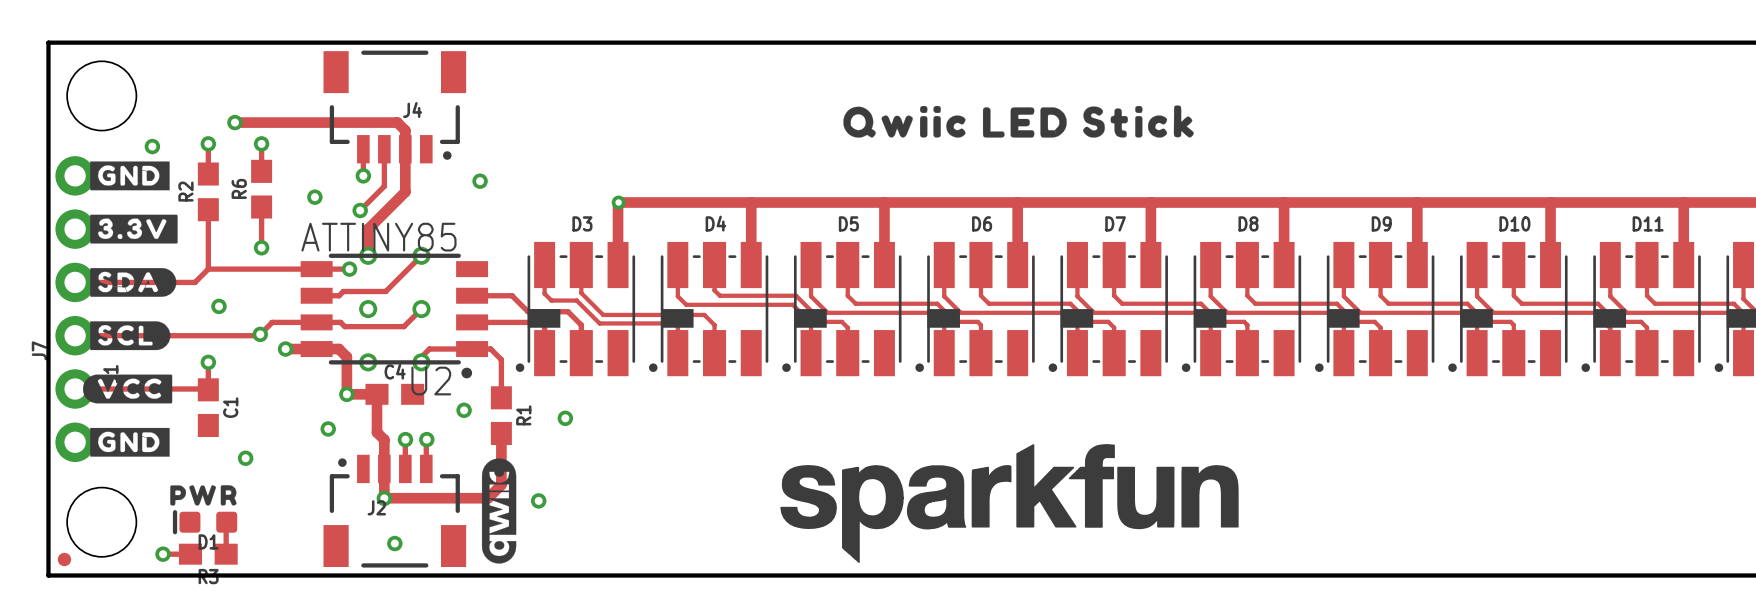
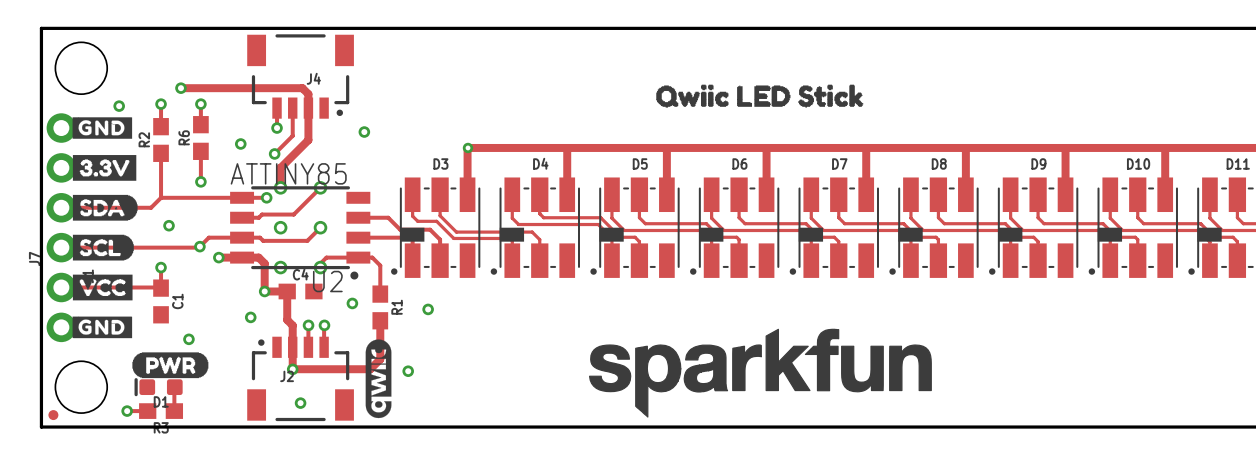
drawing shape: [843, 105, 1194, 138] -> [656, 84, 864, 108]
drawing shape: [90, 214, 178, 244] -> [72, 155, 137, 181]
drawing shape: [90, 268, 177, 297] -> [72, 194, 138, 221]
drawing shape: [90, 321, 171, 351] -> [72, 234, 134, 261]
drawing shape: [83, 374, 173, 404] -> [72, 274, 133, 301]
drawing shape: [170, 485, 237, 506] -> [132, 352, 209, 379]

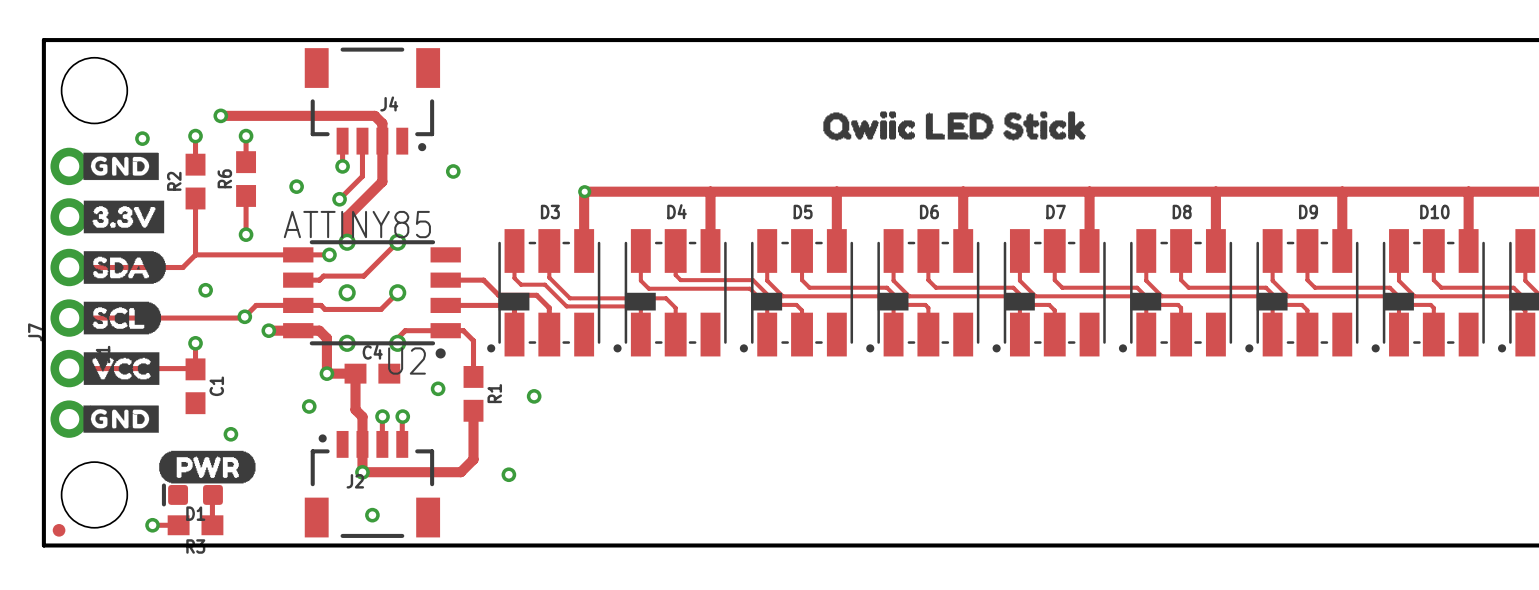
drawing: [588, 328, 932, 418] -> none
drawing: [365, 339, 392, 419] -> none

